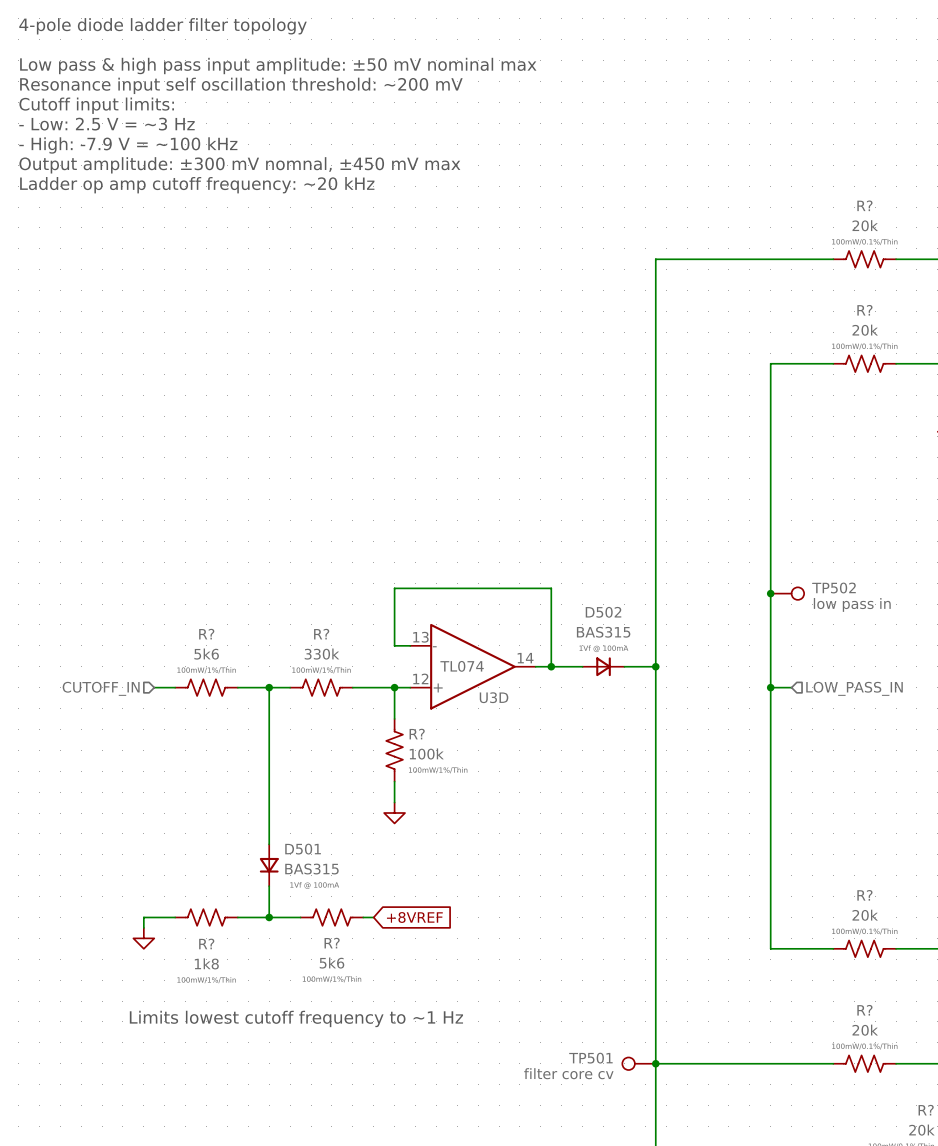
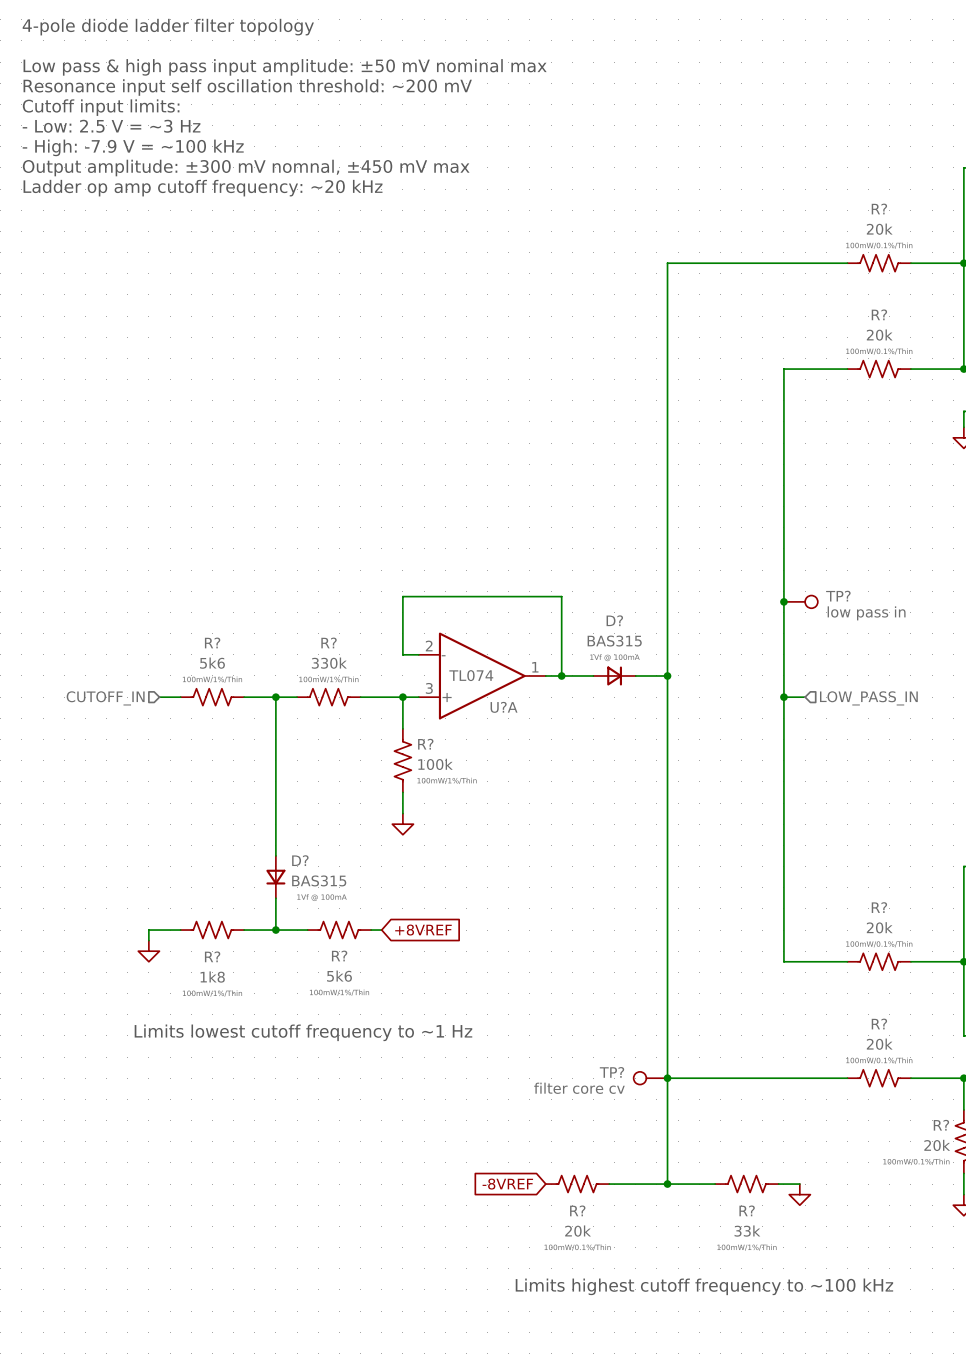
TP502 name: TP502 (834, 588) -> TP? (838, 596)
D502 name: D502 (603, 612) -> D? (614, 620)
U3D pin number: 13 (420, 637) -> 2 (429, 646)
U3D pin number: 14 (525, 658) -> 1 (535, 667)
U3D pin number: 12 (420, 678) -> 3 (429, 688)
U3D name: U3D (494, 697) -> U?A (504, 707)
D501 name: D501 (303, 849) -> D? (300, 860)
TP501 name: TP501 (590, 1058) -> TP? (611, 1072)

